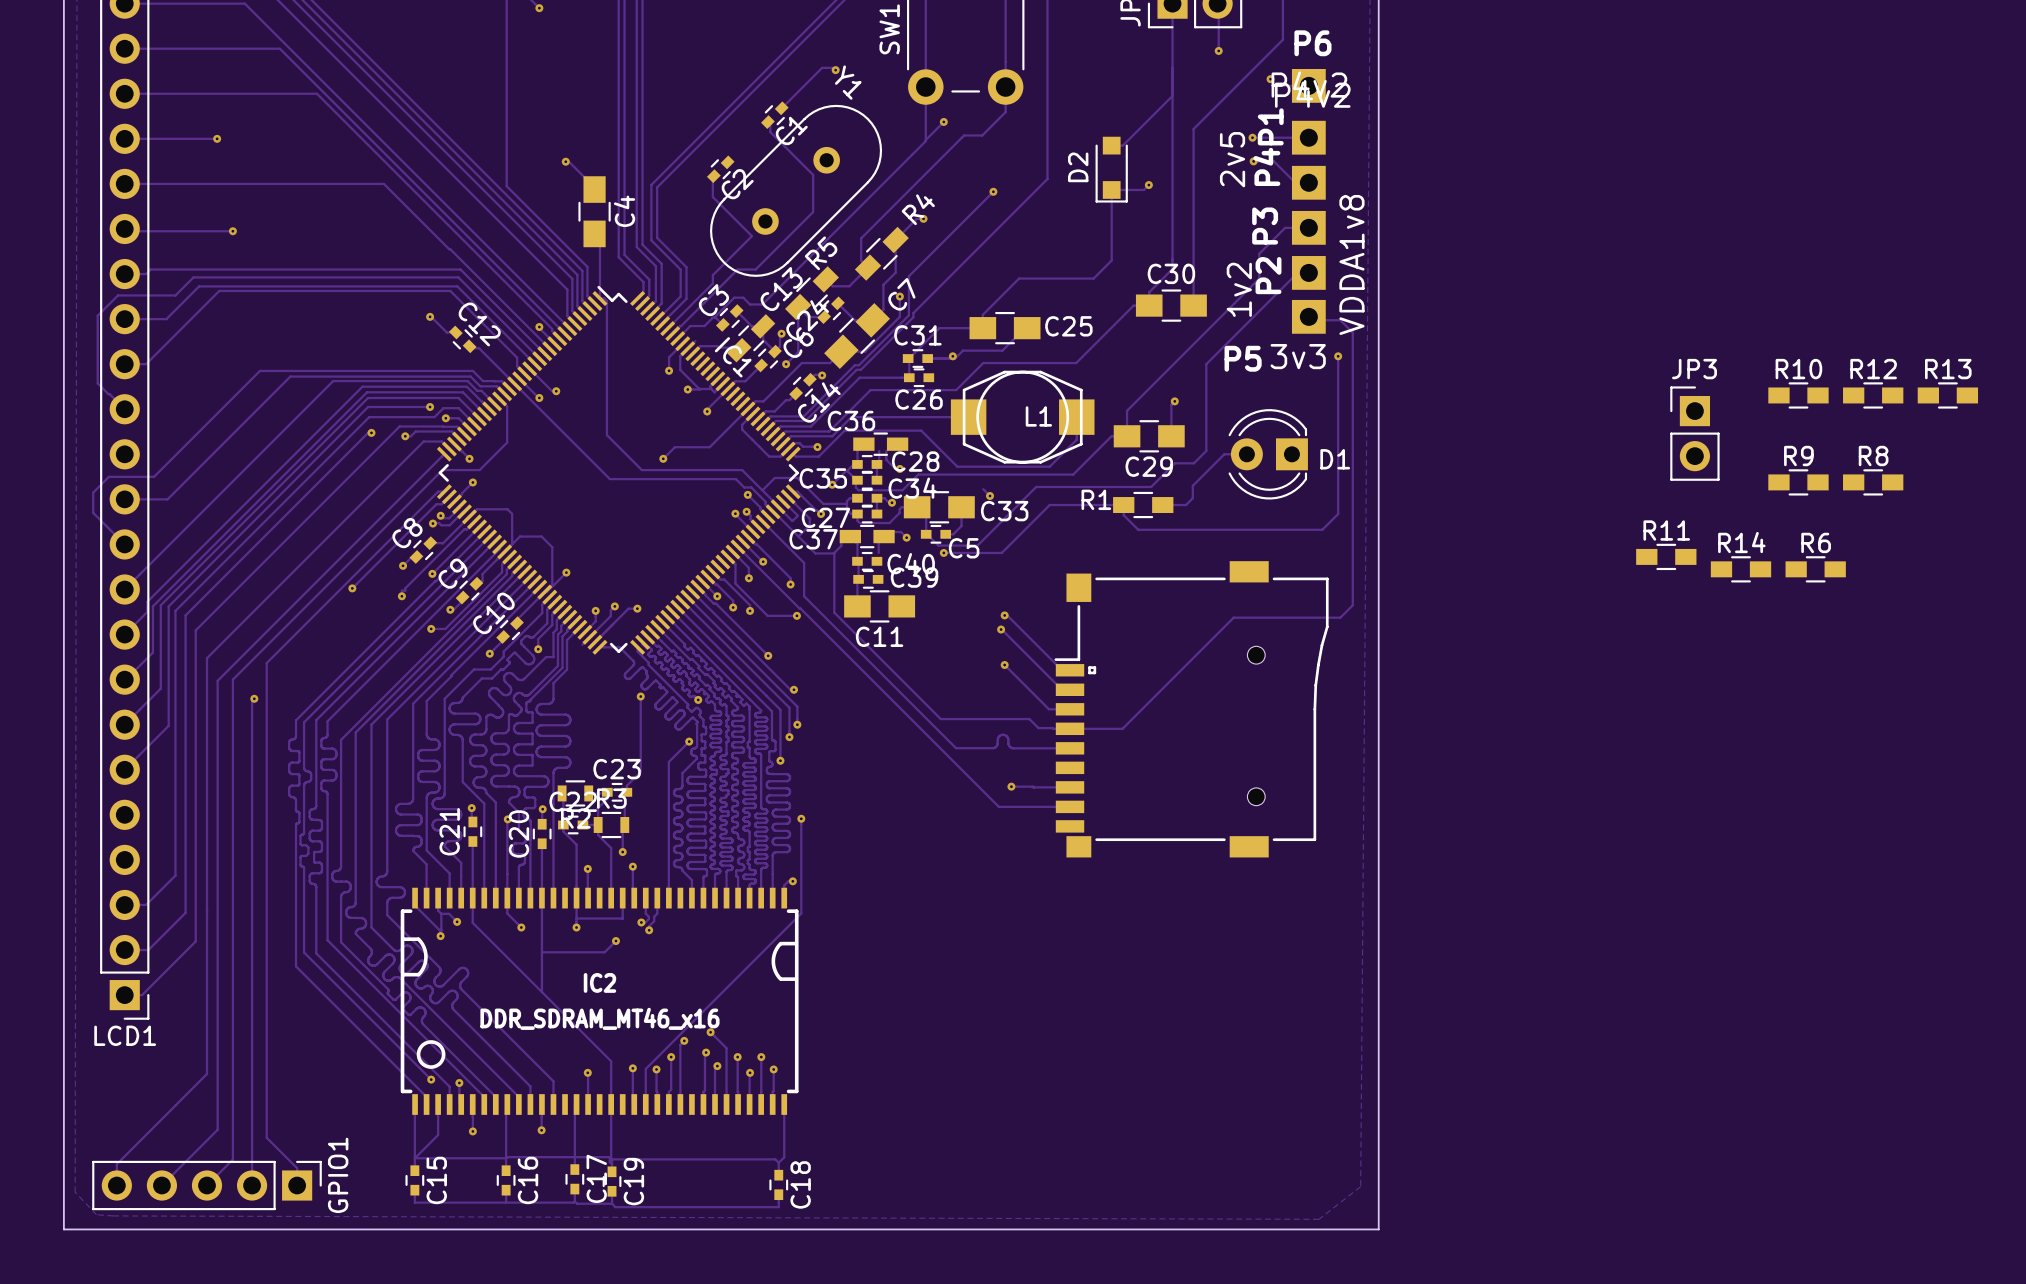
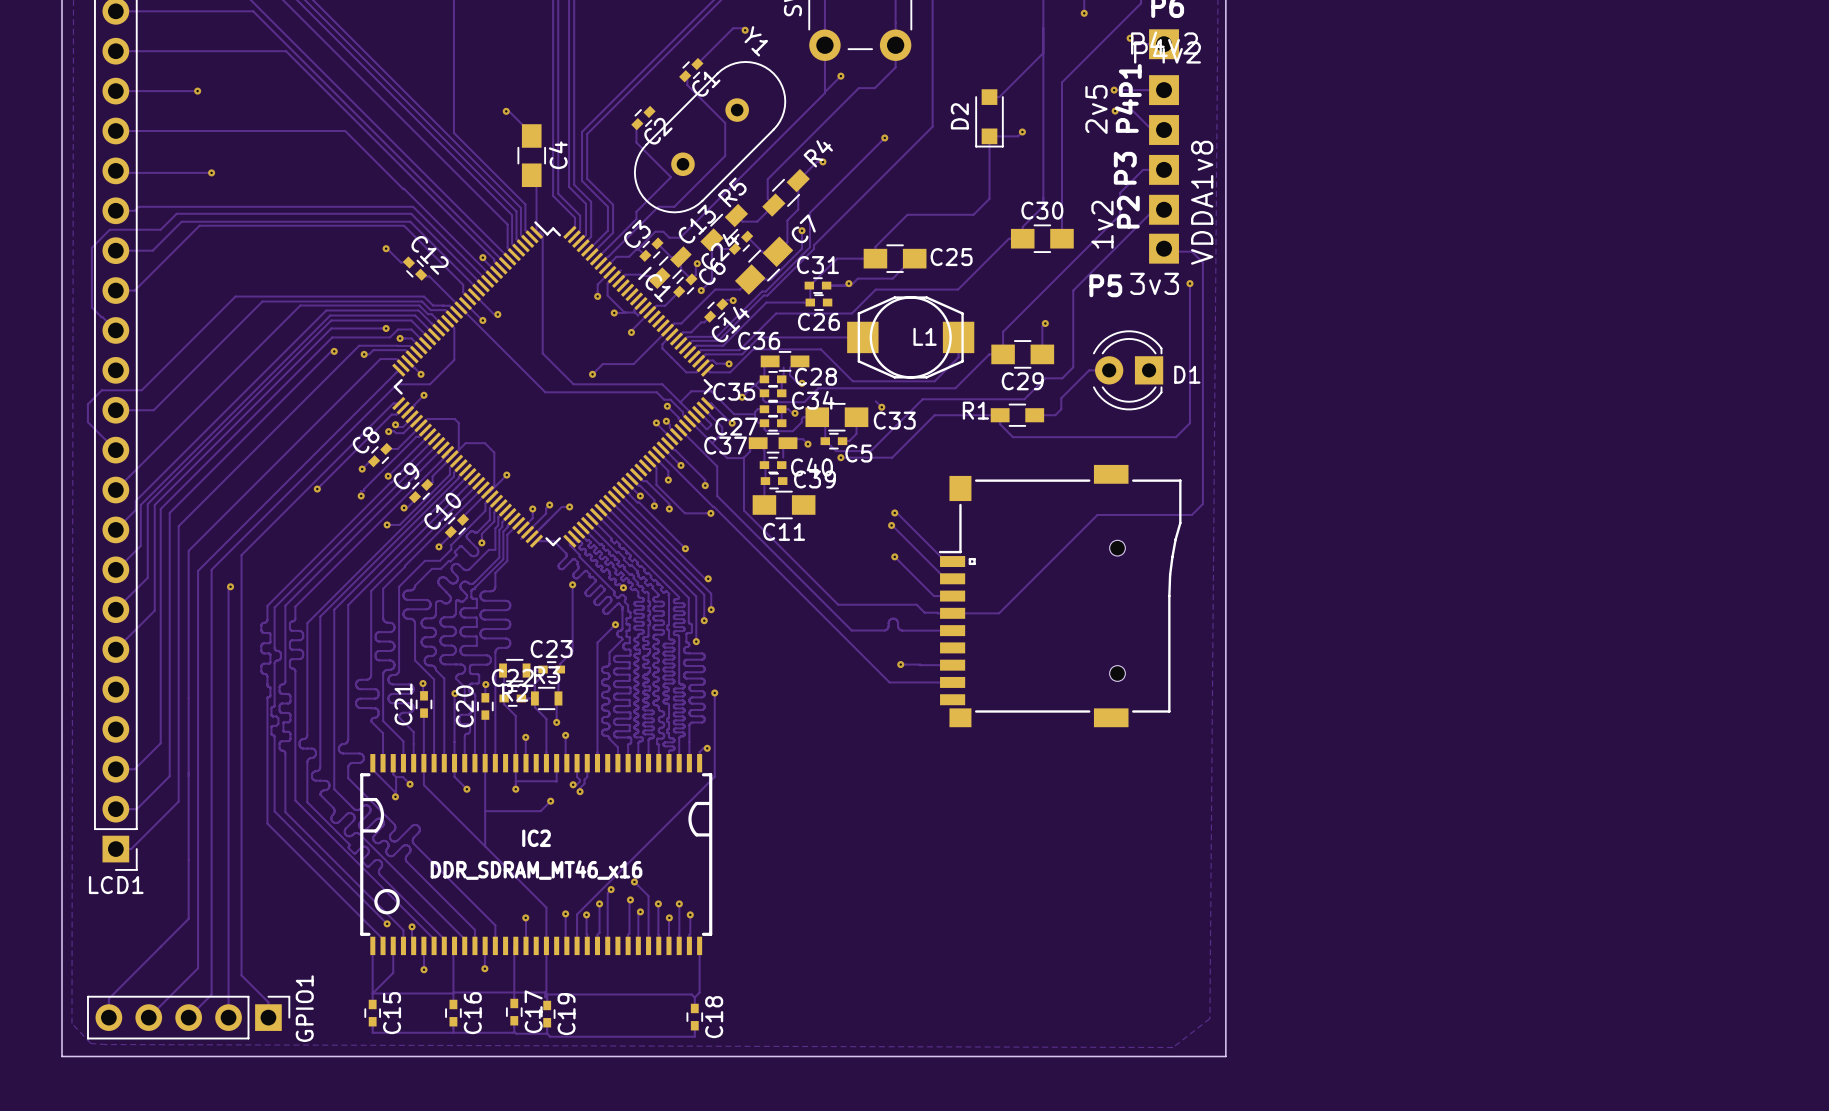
R10: (1798, 395) -> none
R12: (1873, 395) -> none
R13: (1947, 395) -> none
JP3: (1694, 433) -> none
R9: (1798, 482) -> none
R8: (1873, 482) -> none
R11: (1666, 556) -> none
R14: (1741, 569) -> none
R6: (1815, 569) -> none

